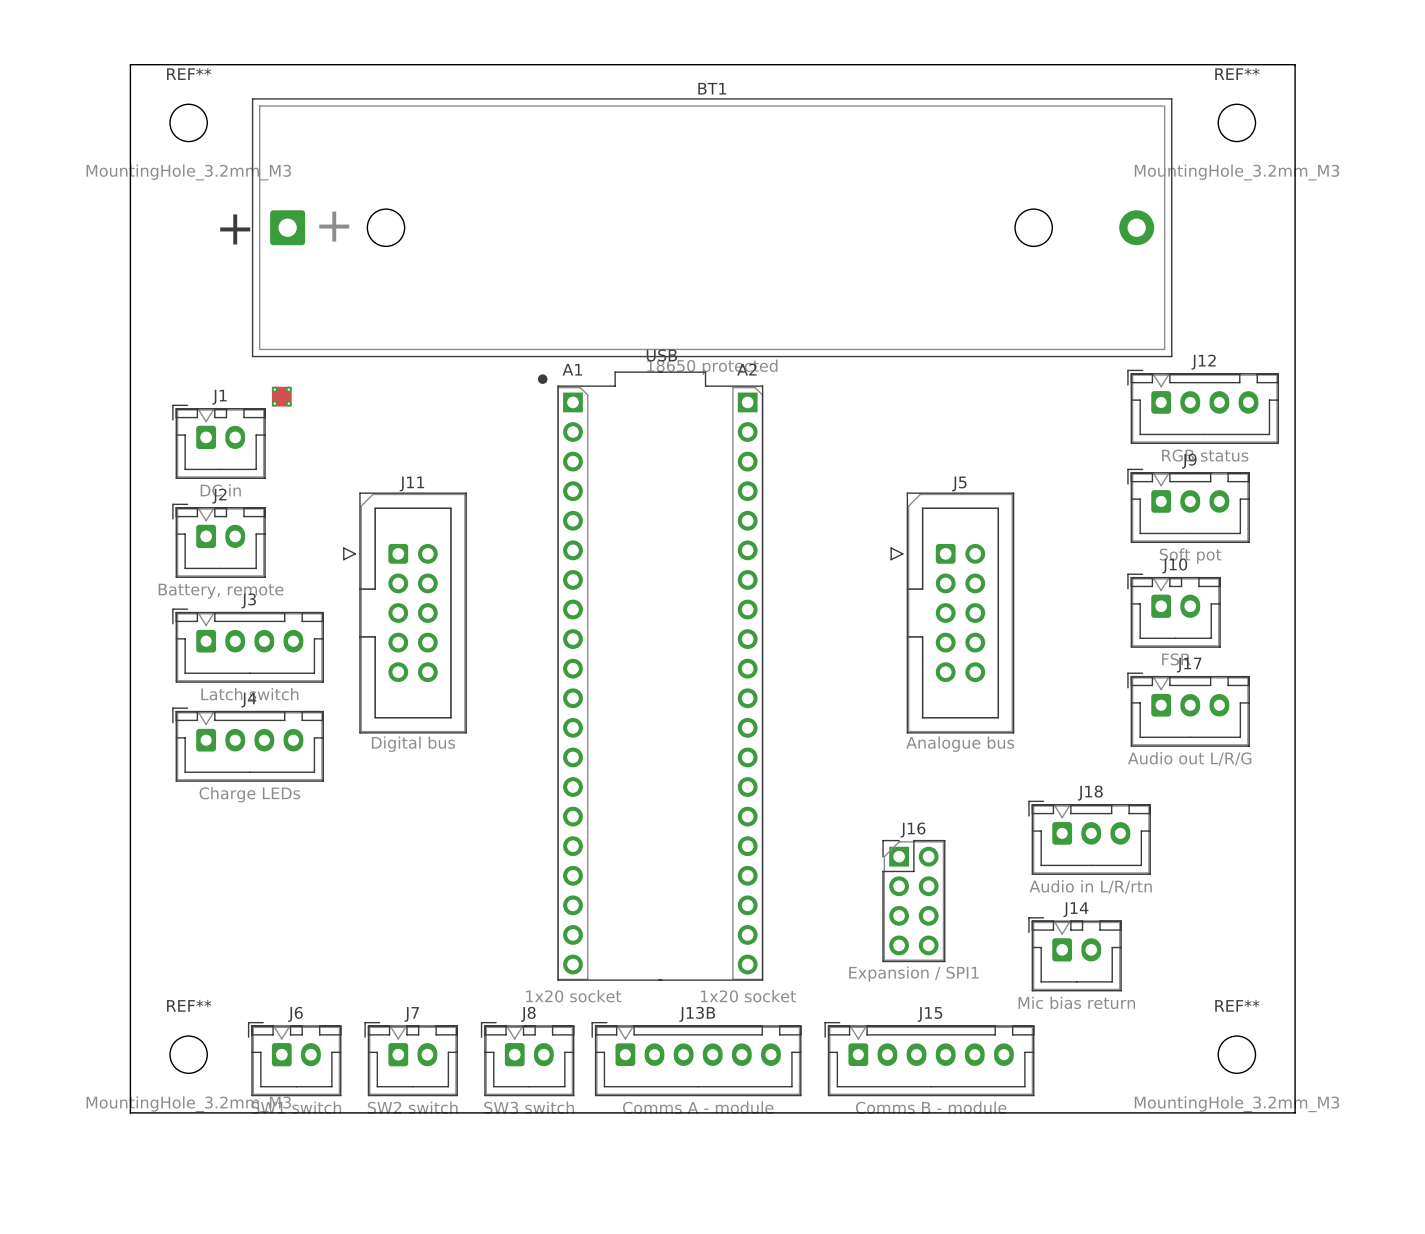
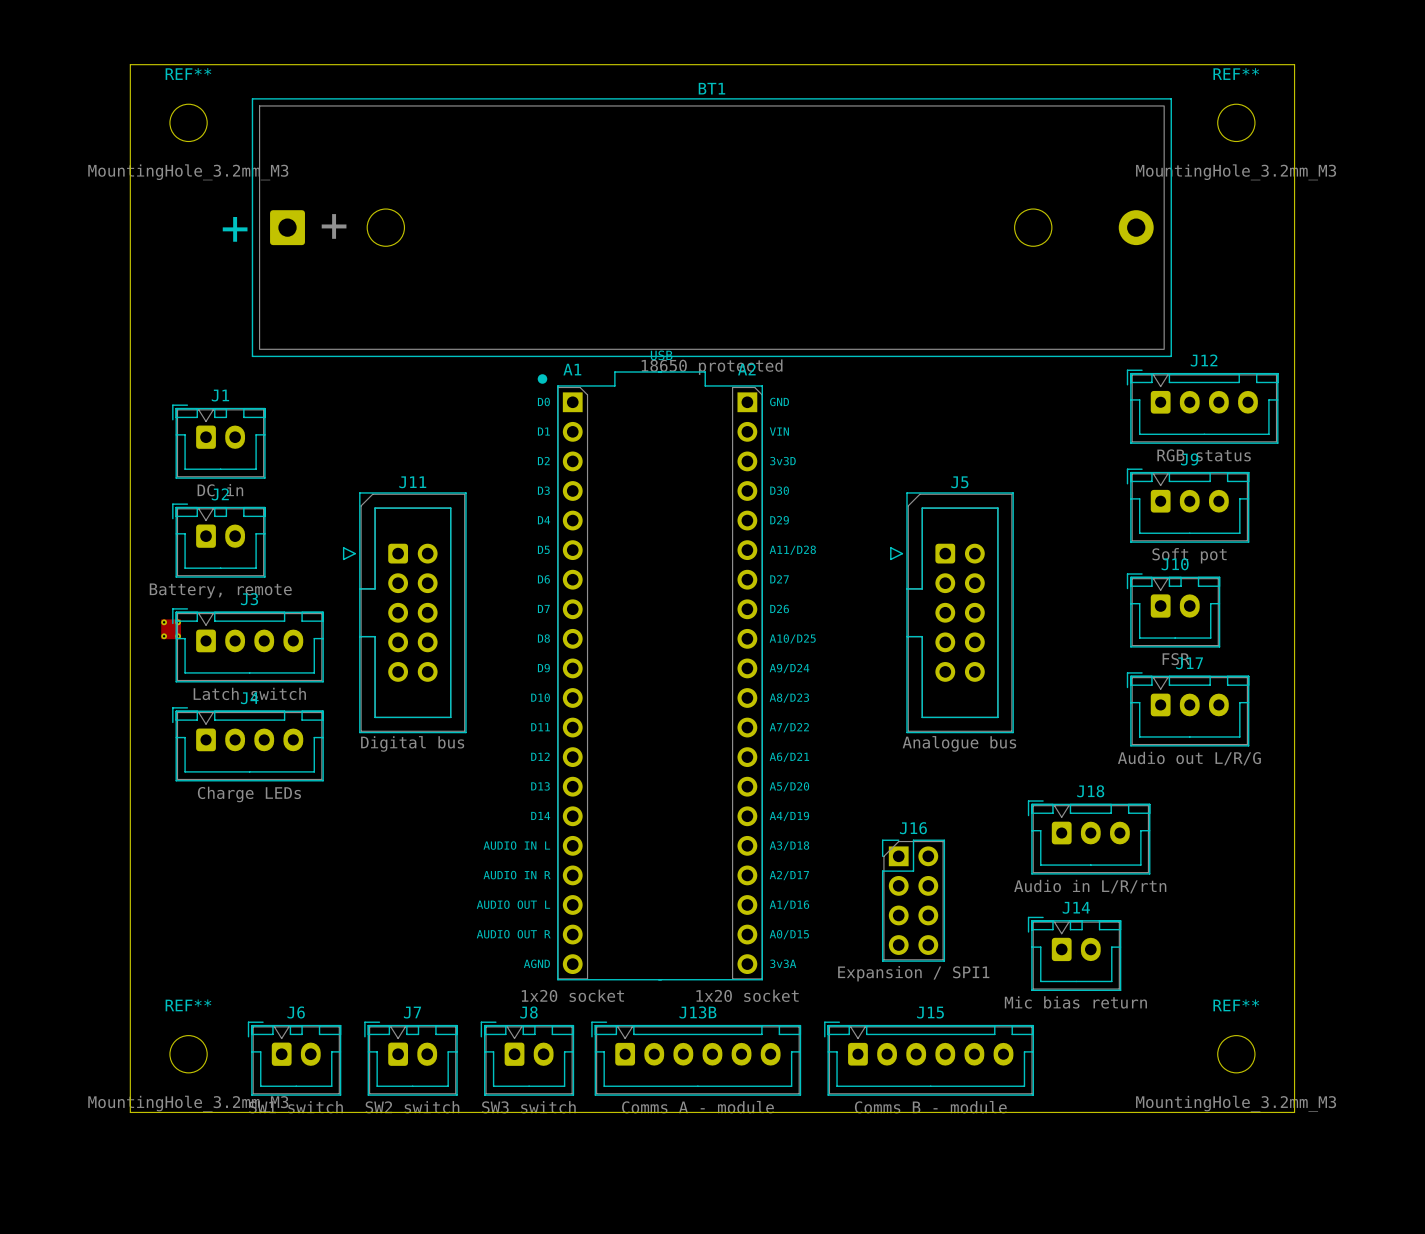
A1 footprint: [537, 371, 663, 981] -> [537, 371, 663, 981]
A2 footprint: [658, 371, 764, 981] -> [657, 371, 763, 981]
part position: (281, 396) -> (171, 629)

